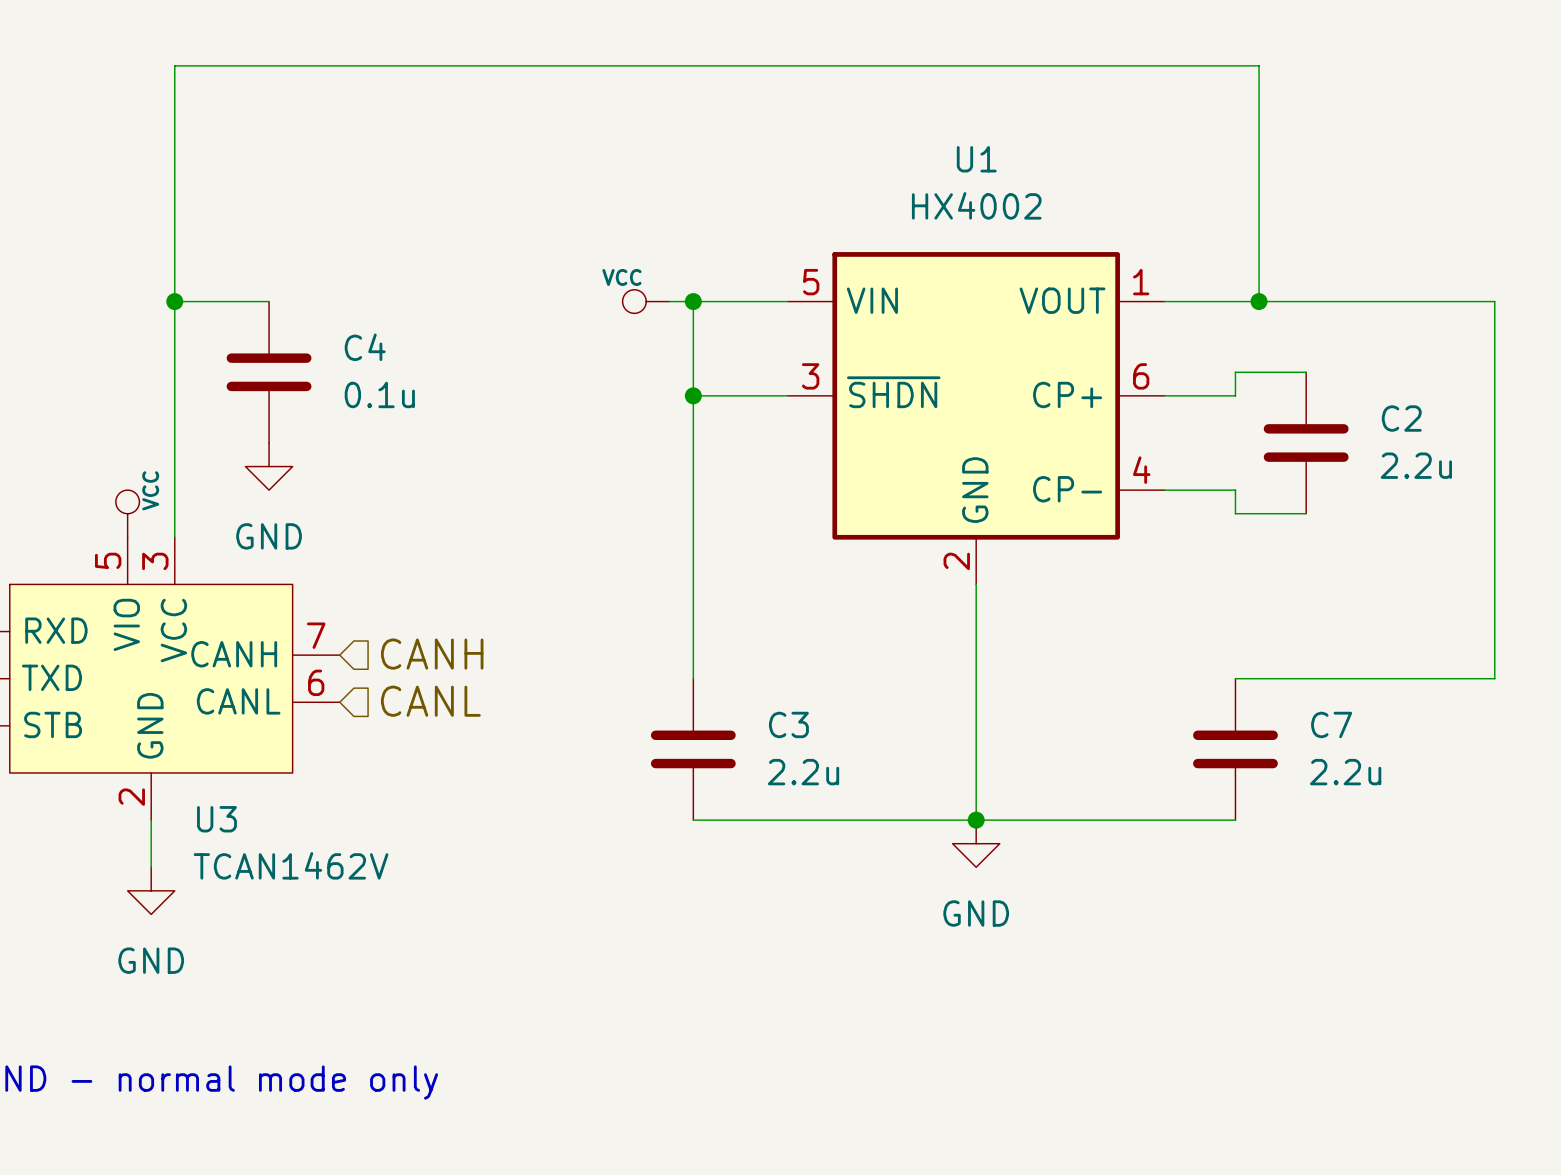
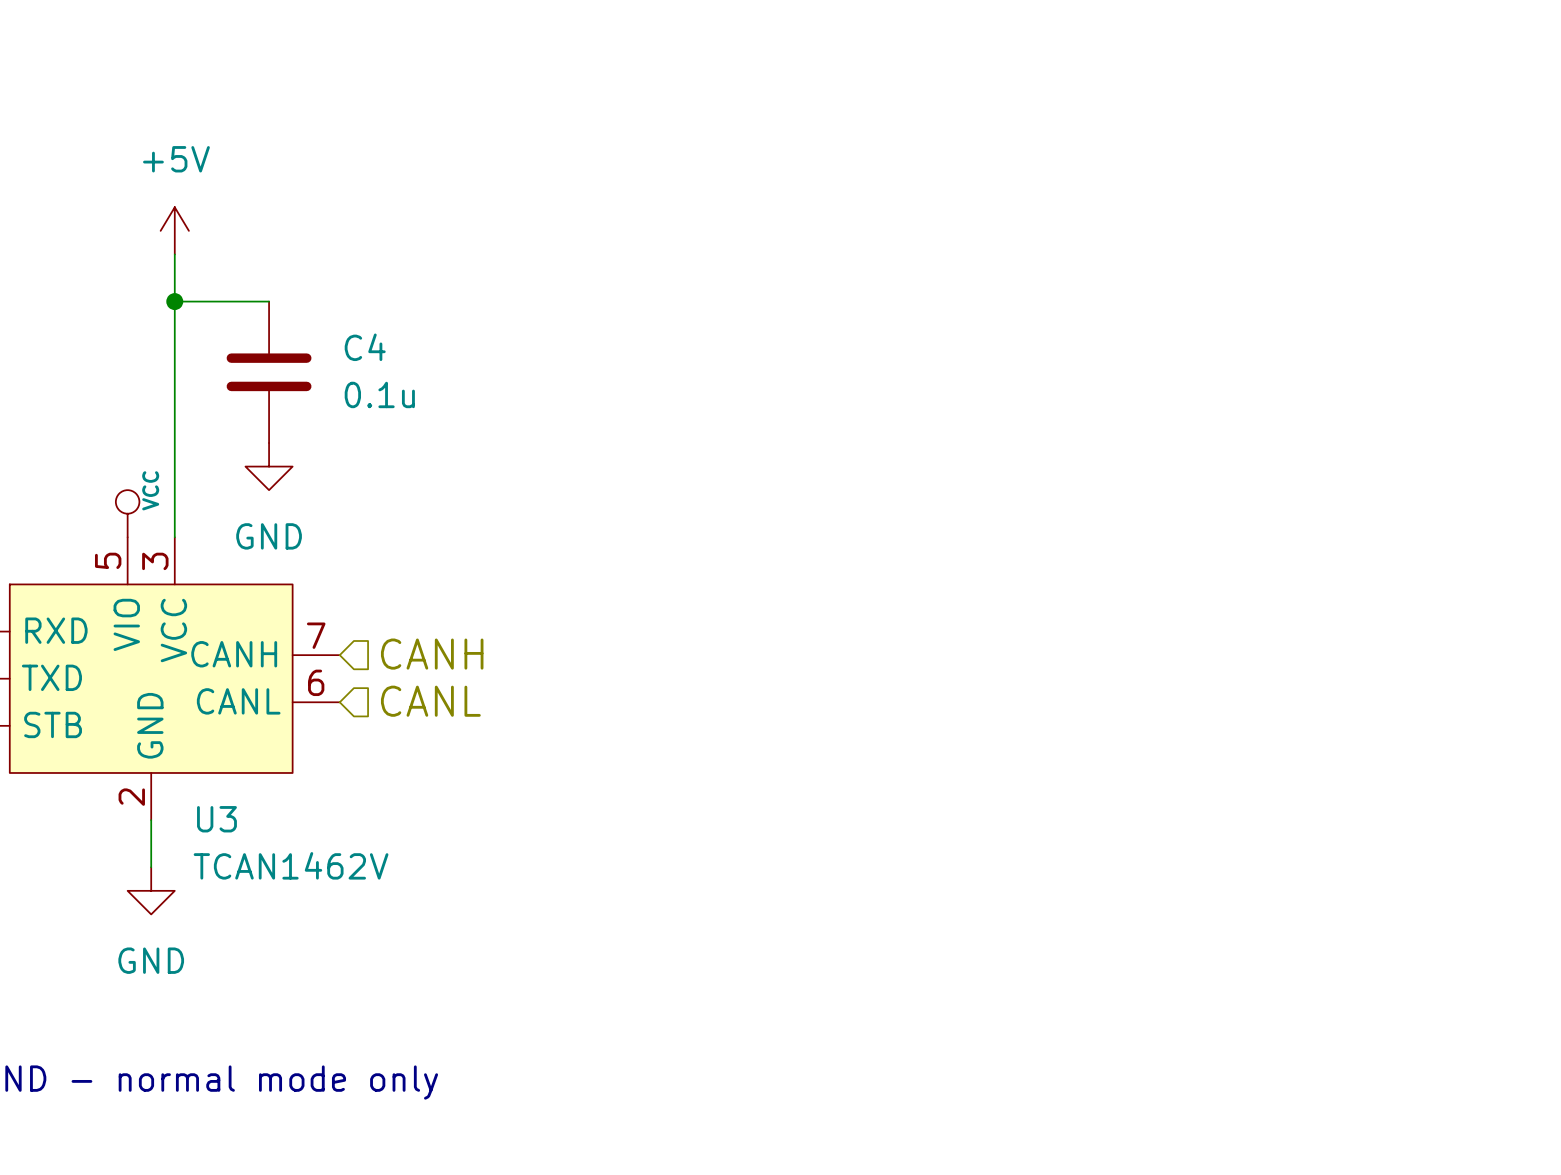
power symbol: none -> +5V (174, 230)
wire: (174, 254) (174, 65) (1259, 65) (1259, 301) -> none
power symbol: VCC (646, 301) -> none
wire: (669, 301) (787, 301) -> none
wire: (693, 301) (693, 678) -> none
junction: (693, 301) -> none
wire: (1164, 301) (1494, 301) (1494, 678) (1235, 678) -> none
junction: (1259, 301) -> none
wire: (1306, 372) (1235, 372) (1235, 395) (1164, 395) -> none
wire: (693, 395) (787, 395) -> none
junction: (693, 395) -> none
U1: HX4002 (976, 418) -> none
C2: 2.2u (1306, 443) -> none
wire: (1164, 490) (1235, 490) (1235, 513) (1306, 513) -> none
wire: (976, 584) (976, 820) -> none
C3: 2.2u (693, 749) -> none
C7: 2.2u (1235, 749) -> none
wire: (693, 820) (1235, 820) -> none
junction: (976, 820) -> none
power symbol: GND (976, 843) -> none

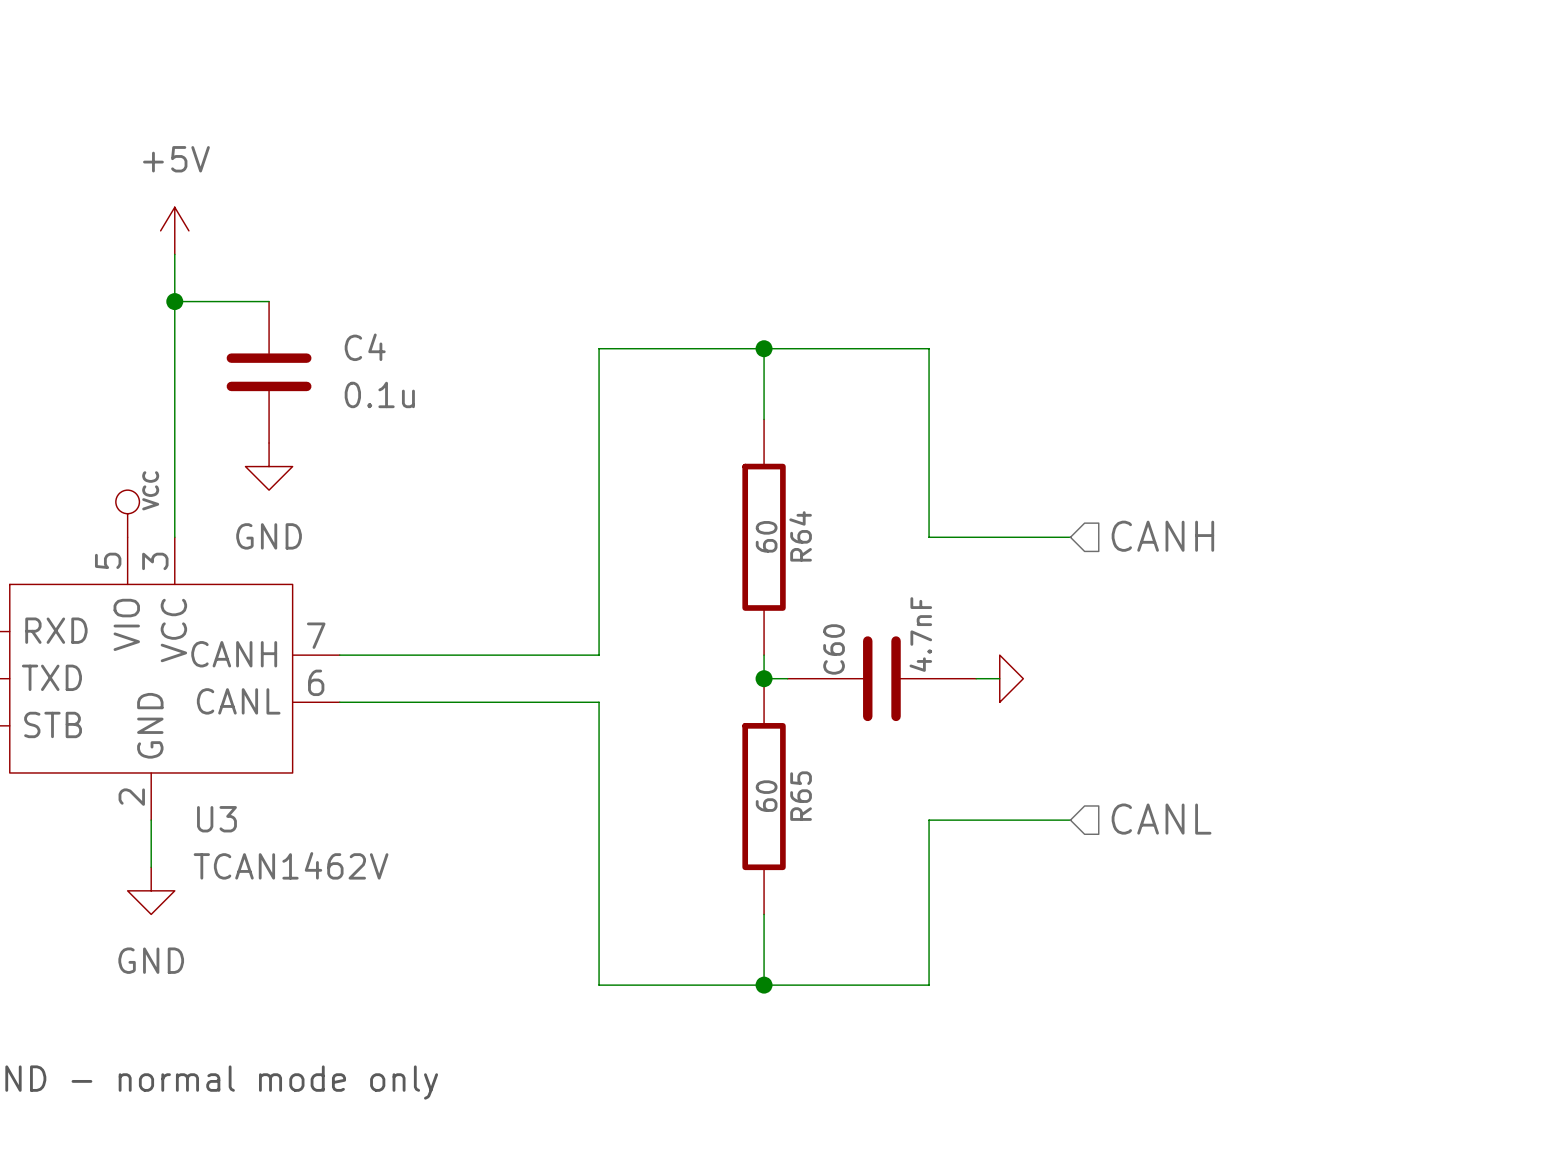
wire: none -> (764, 348) (764, 419)
junction: none -> (764, 348)
hierarchical label: none -> CANH (1162, 536)
R64: none -> 60 (764, 537)
wire: none -> (1070, 537) (929, 537) (929, 348) (599, 348) (599, 655) (339, 655)
hierarchical label: CANH (432, 654) -> none
wire: none -> (764, 655) (764, 678) (787, 678)
junction: none -> (764, 678)
C60: none -> 4.7nF (881, 678)
wire: none -> (976, 678) (999, 678)
power symbol: none -> (1011, 678)
hierarchical label: CANL (430, 701) -> none
wire: none -> (339, 702) (599, 702) (599, 985) (929, 985) (929, 820) (1070, 820)
R65: none -> 60 (764, 796)
hierarchical label: none -> CANL (1161, 819)
wire: none -> (764, 914) (764, 985)
junction: none -> (764, 985)

